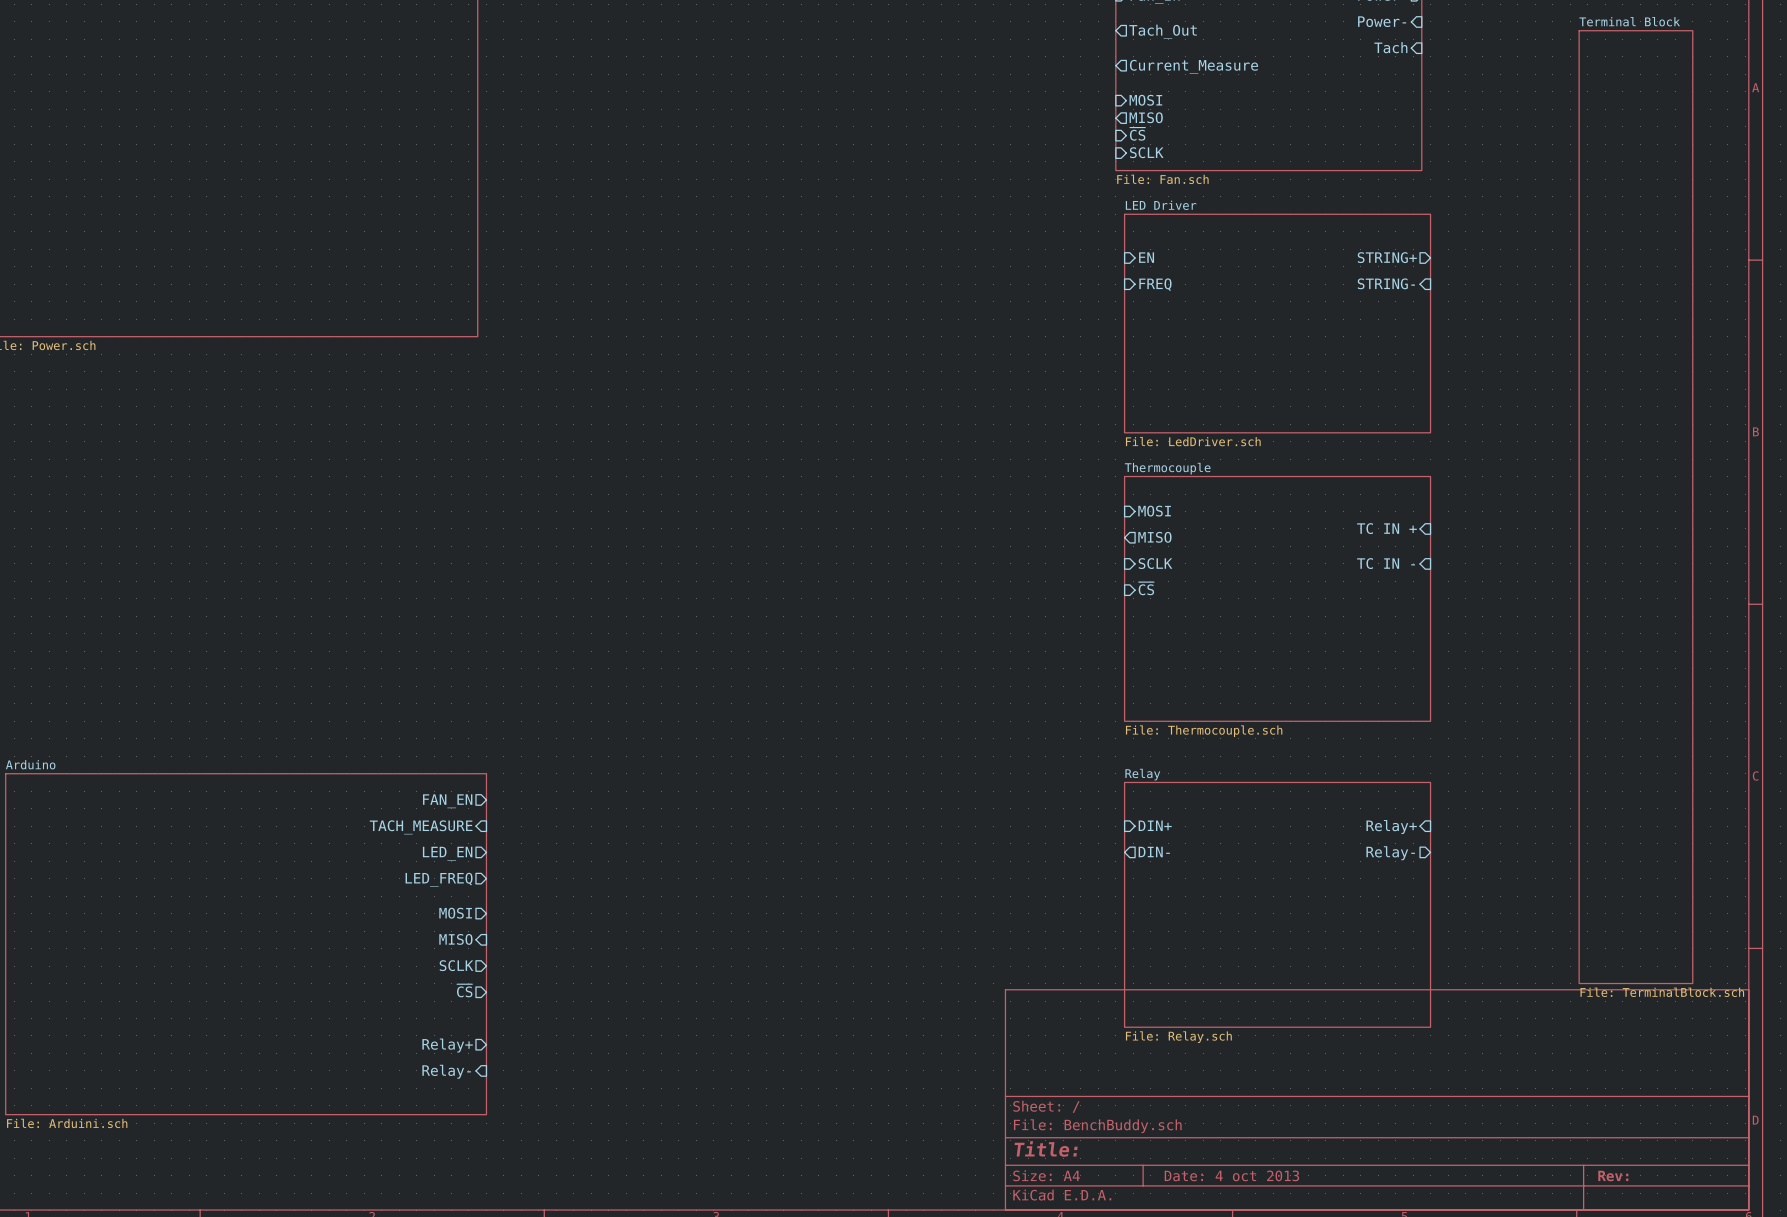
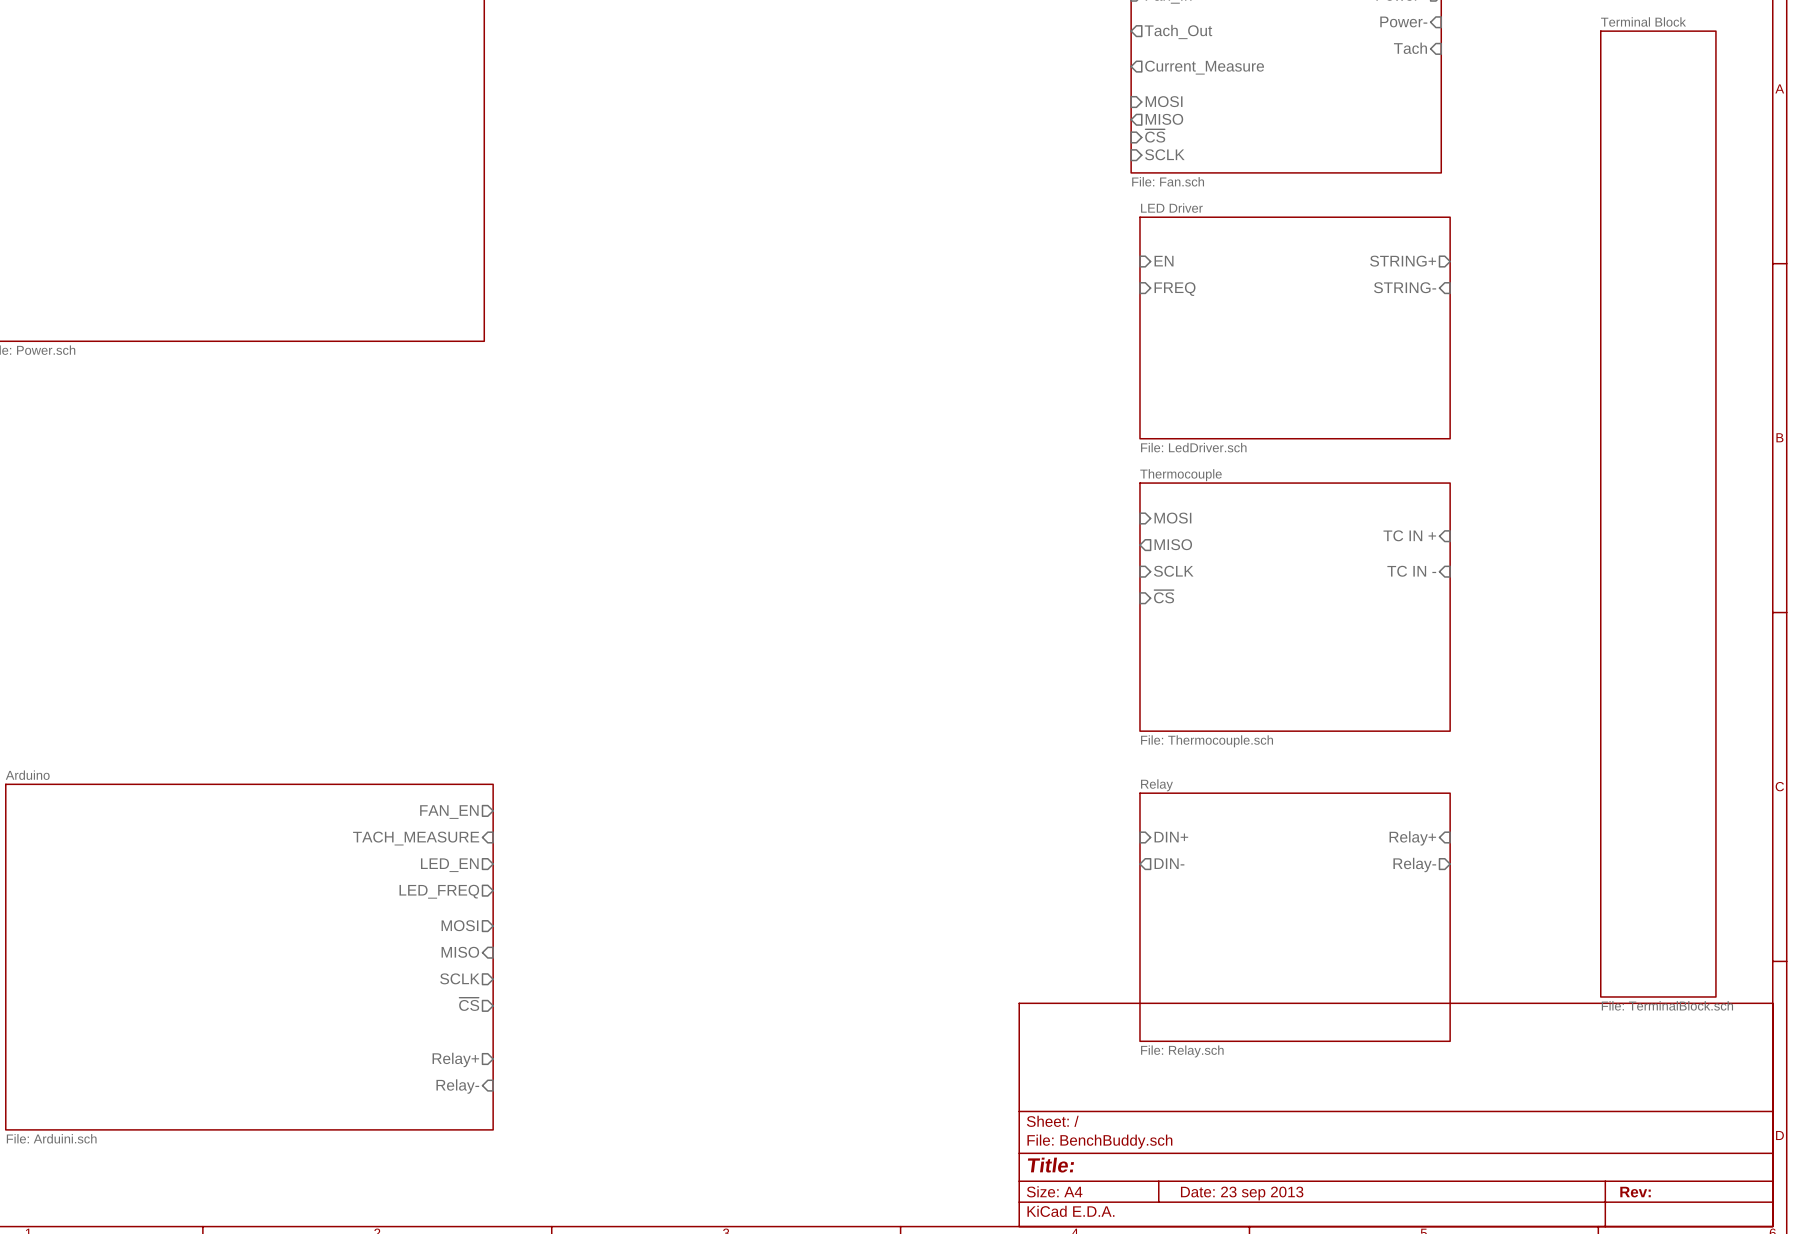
title block: Date: 4 oct 2013 (1231, 1175) -> Date: 23 sep 2013 (1242, 1193)

